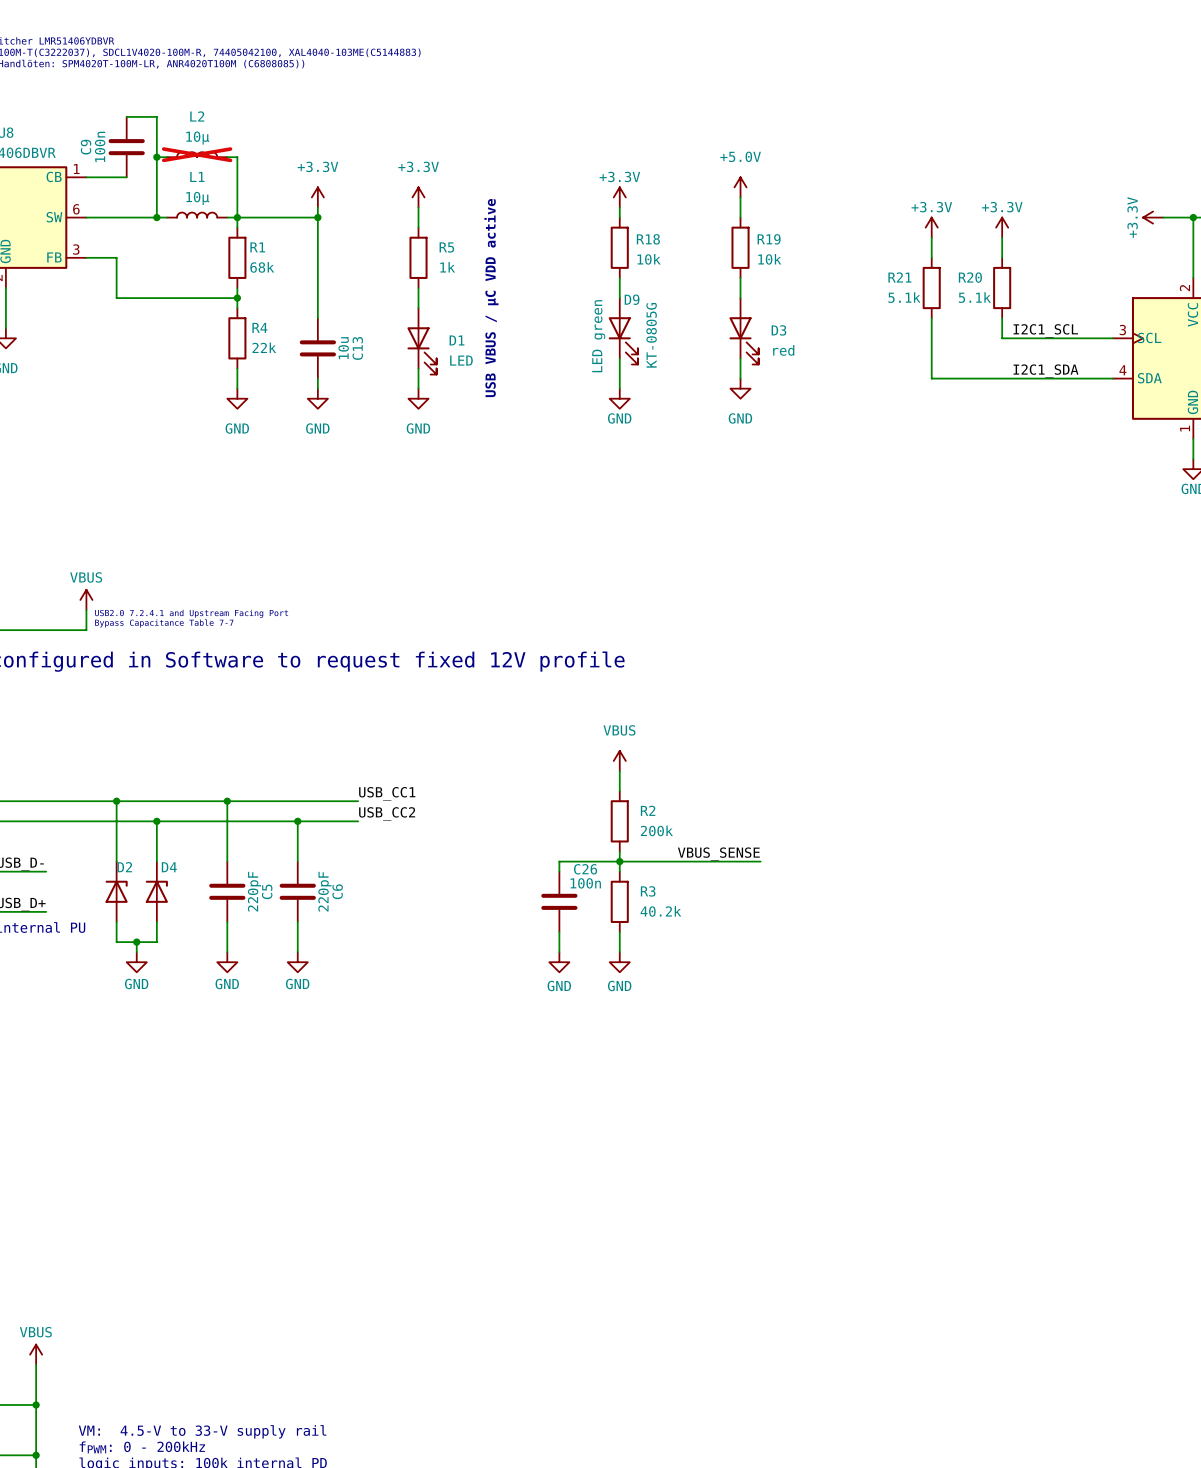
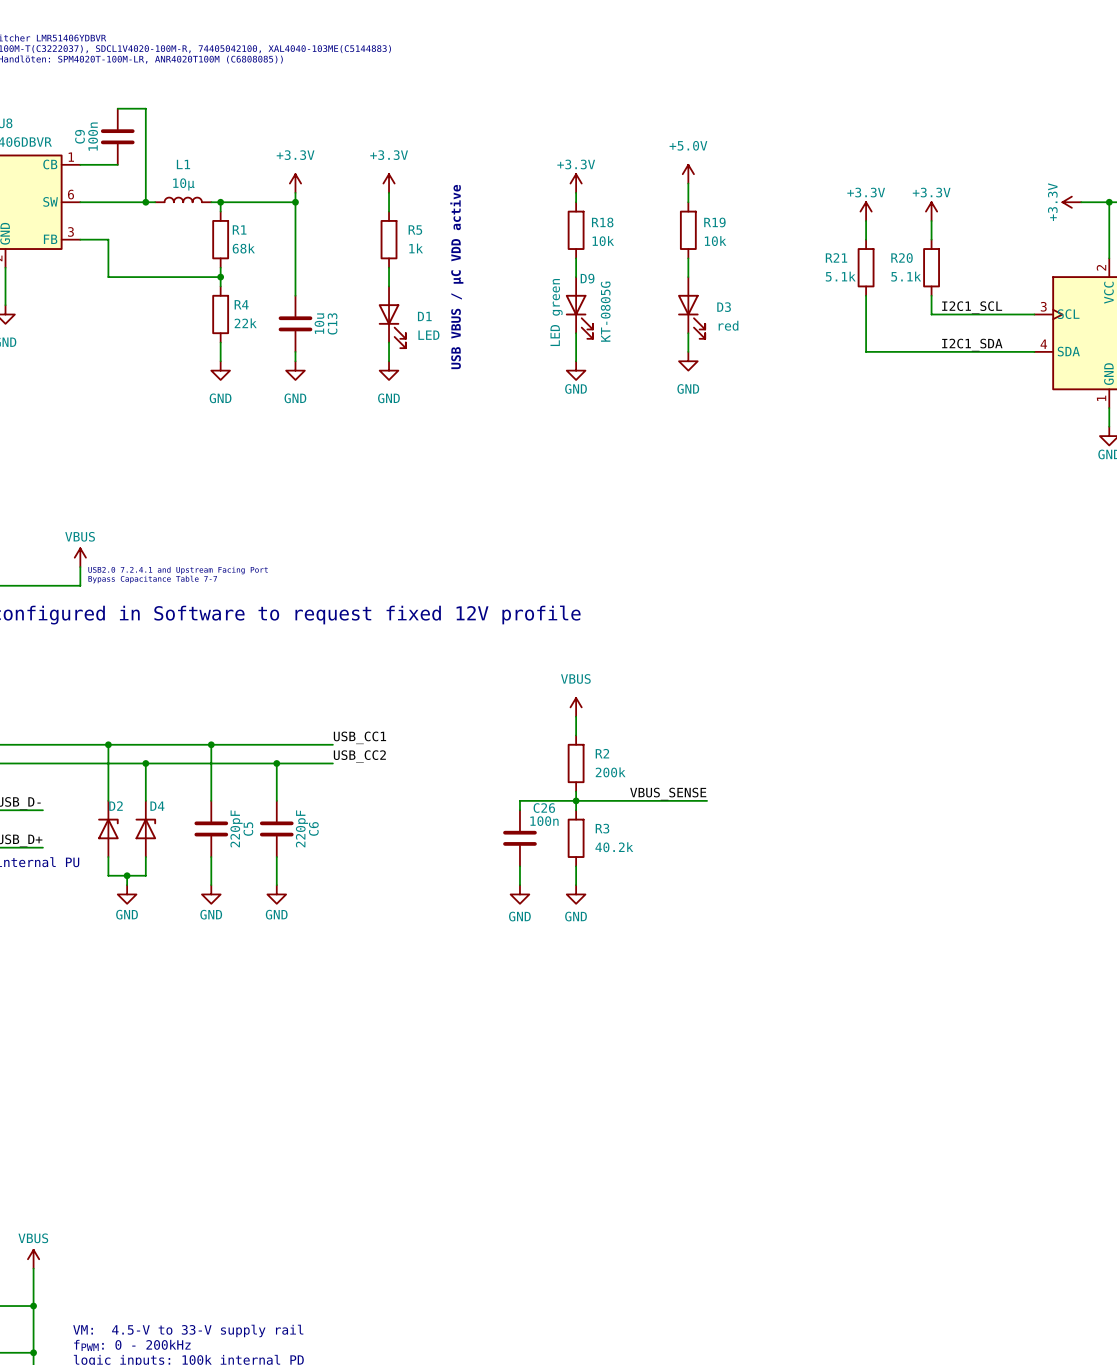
L2: 10µ (197, 154) -> none
wire: (156, 157) (166, 157) -> none
junction: (156, 157) -> none
wire: (227, 157) (237, 157) (237, 217) -> none

